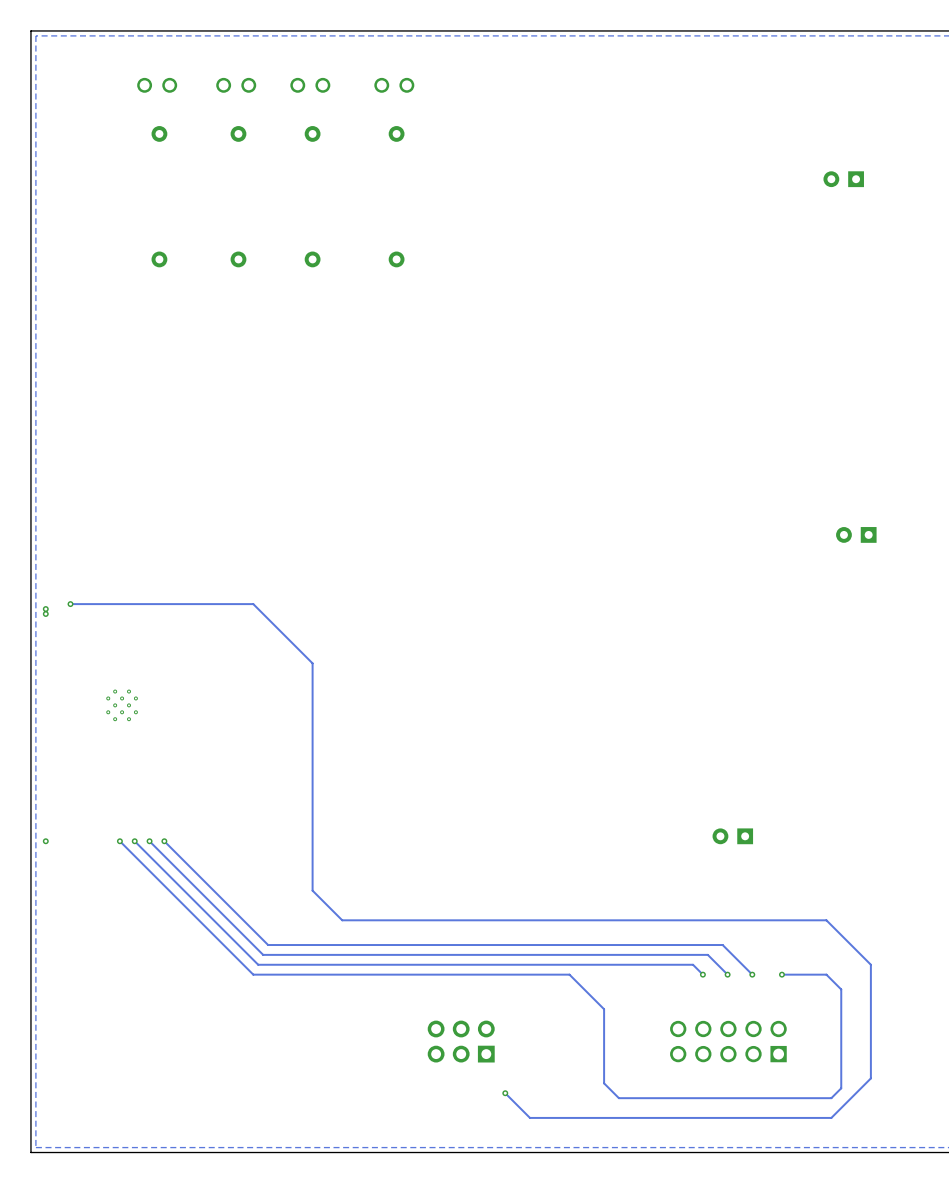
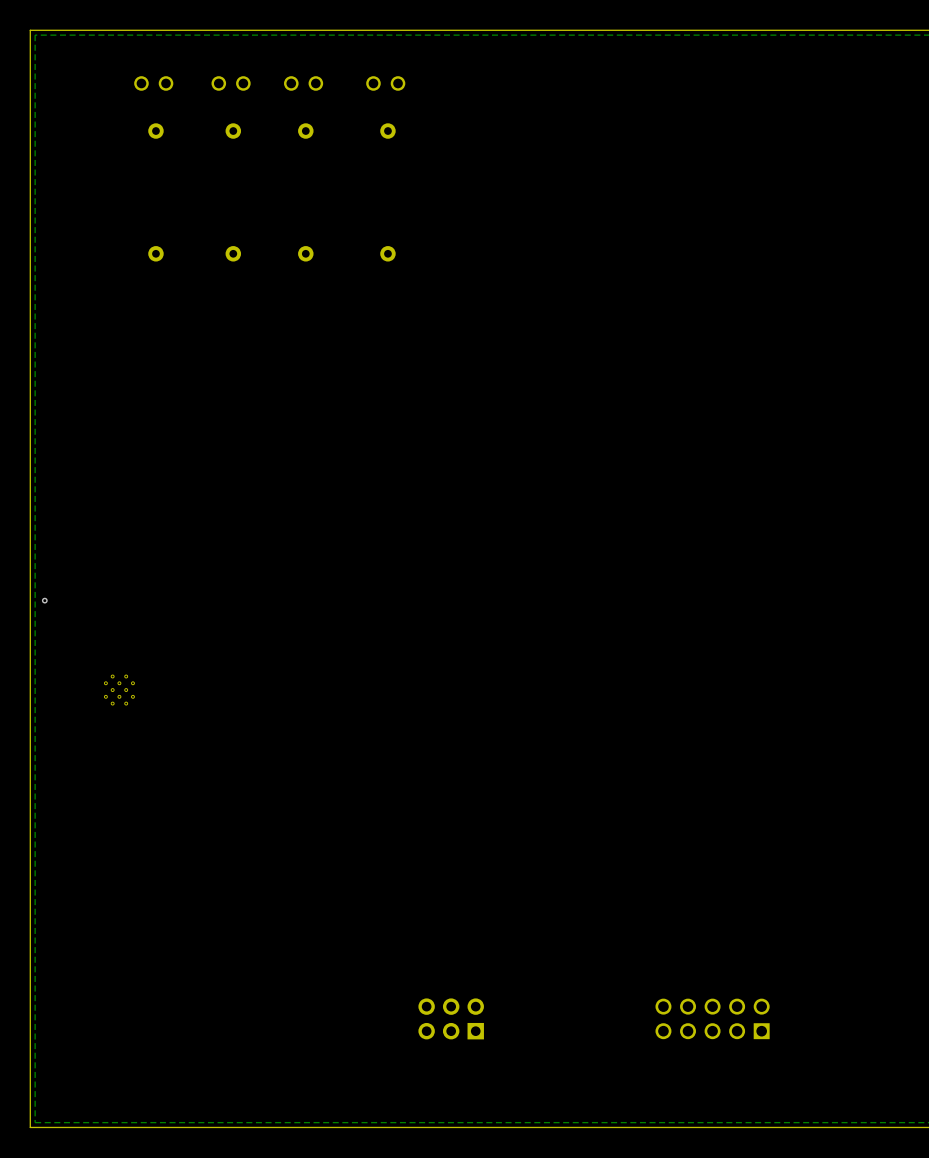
part: (843, 179) -> none
part: (856, 534) -> none
track: (70, 604) (253, 604) (312, 663) (312, 890) (342, 920) (826, 920) (870, 964) (870, 1078) (831, 1117) (529, 1117) (505, 1093) -> none
via: (70, 604) -> none
via: (45, 609) -> none
part: (732, 836) -> none
via: (45, 841) -> none
track: (119, 841) (253, 974) (569, 974) (604, 1009) (604, 1083) (618, 1098) (831, 1098) (841, 1088) (841, 989) (826, 974) (781, 974) -> none
via: (119, 841) -> none
track: (134, 841) (258, 964) (693, 964) (702, 974) -> none
via: (134, 841) -> none
track: (149, 841) (263, 954) (707, 954) (727, 974) -> none
via: (149, 841) -> none
track: (164, 841) (268, 945) (722, 945) (752, 974) -> none
via: (164, 841) -> none
via: (702, 974) -> none
via: (727, 974) -> none
via: (752, 974) -> none
via: (781, 974) -> none
via: (505, 1093) -> none

